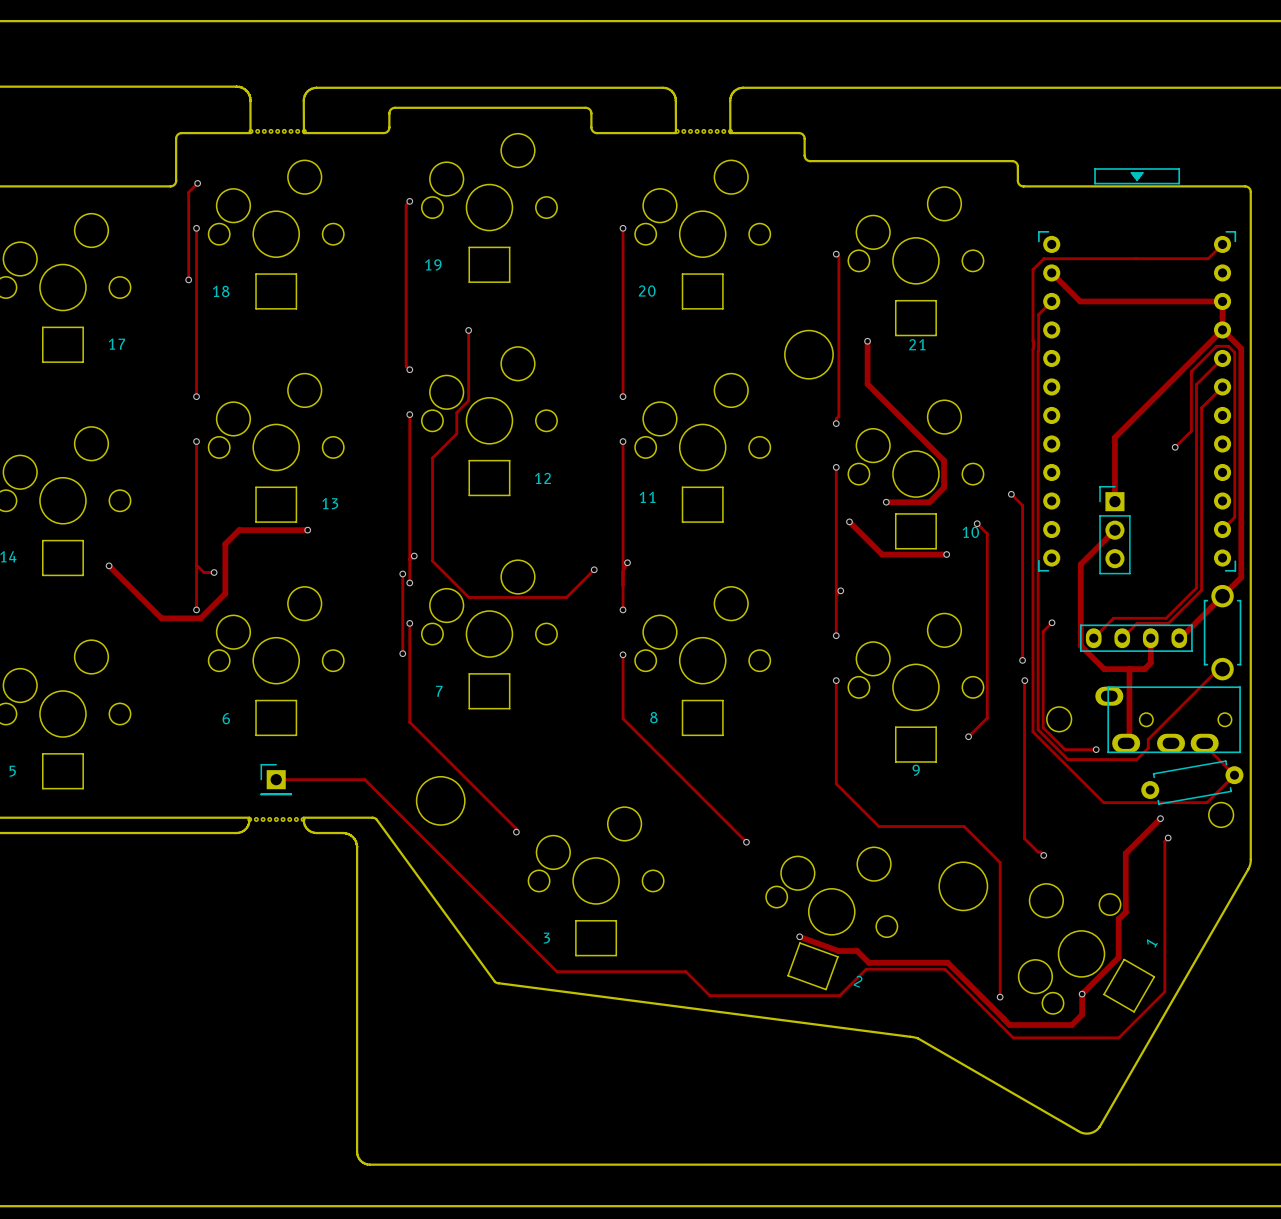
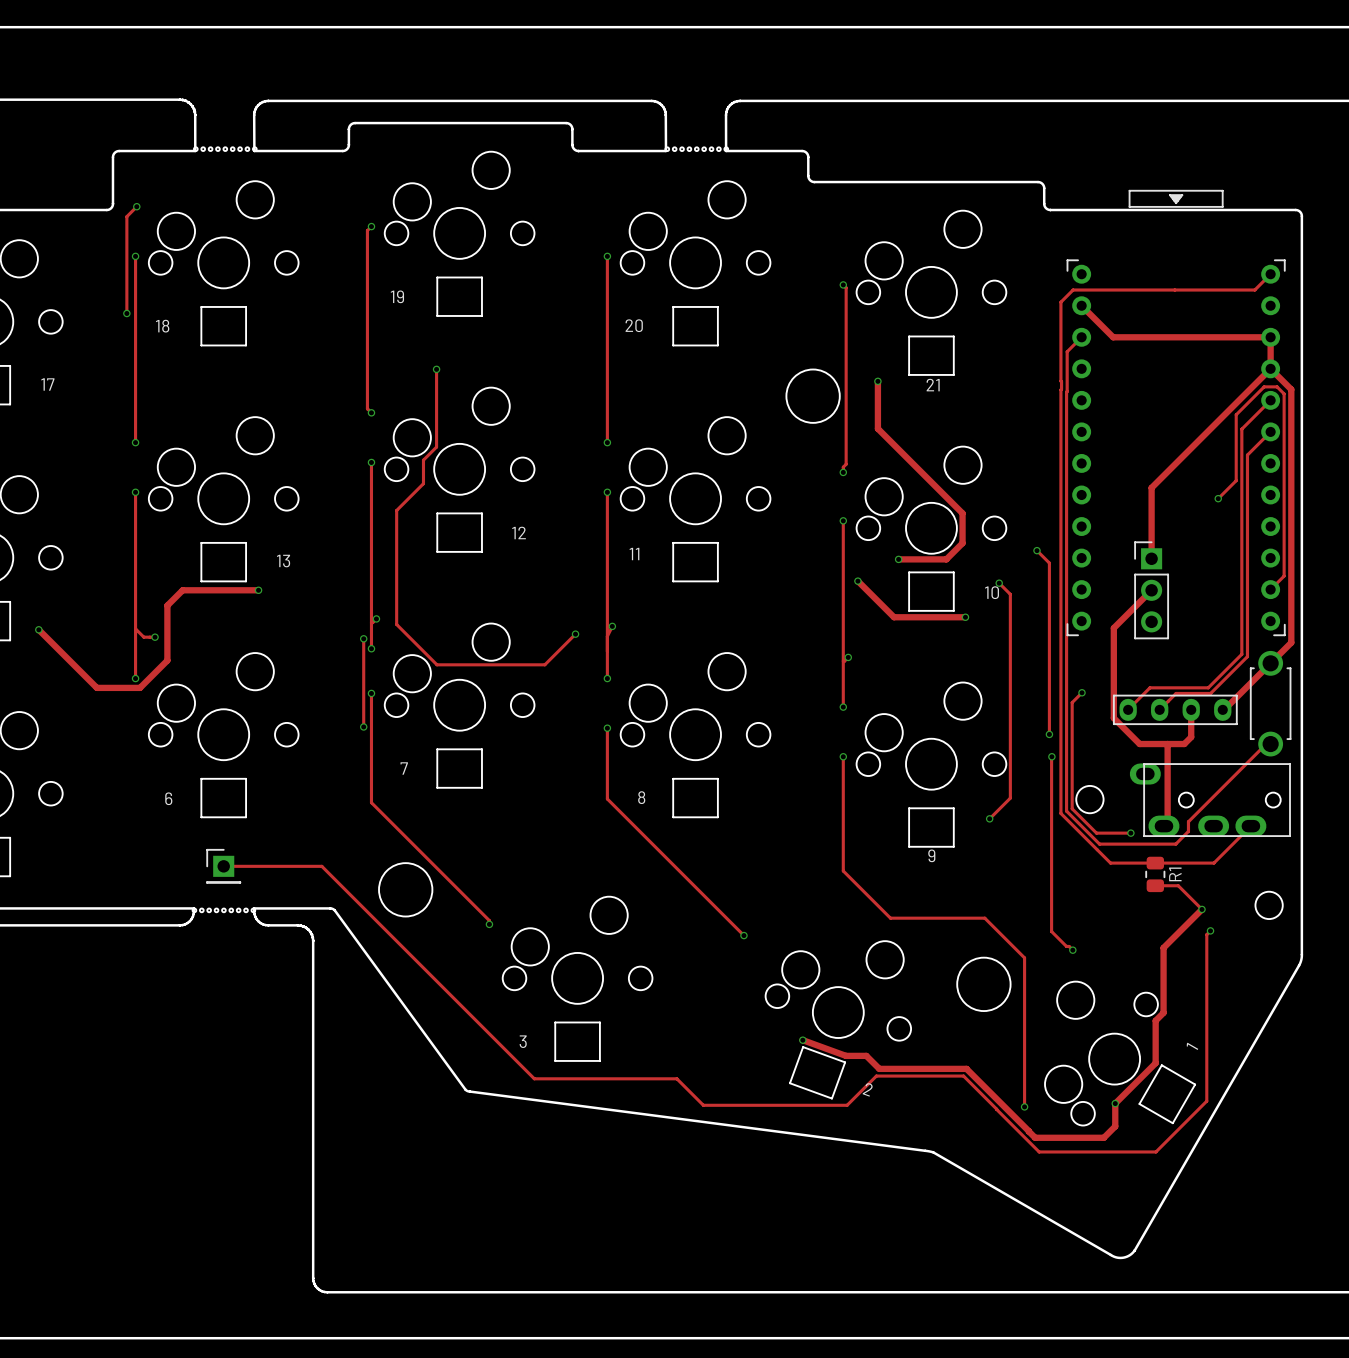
track: (1204, 745) (1234, 775) (1207, 802) (1103, 802) (1077, 776) -> (1250, 826) (1213, 863) (1110, 863)
part: (1192, 782) -> none
R1: none -> (1155, 874)
track: none -> (1155, 885) (1178, 885) (1202, 909)

